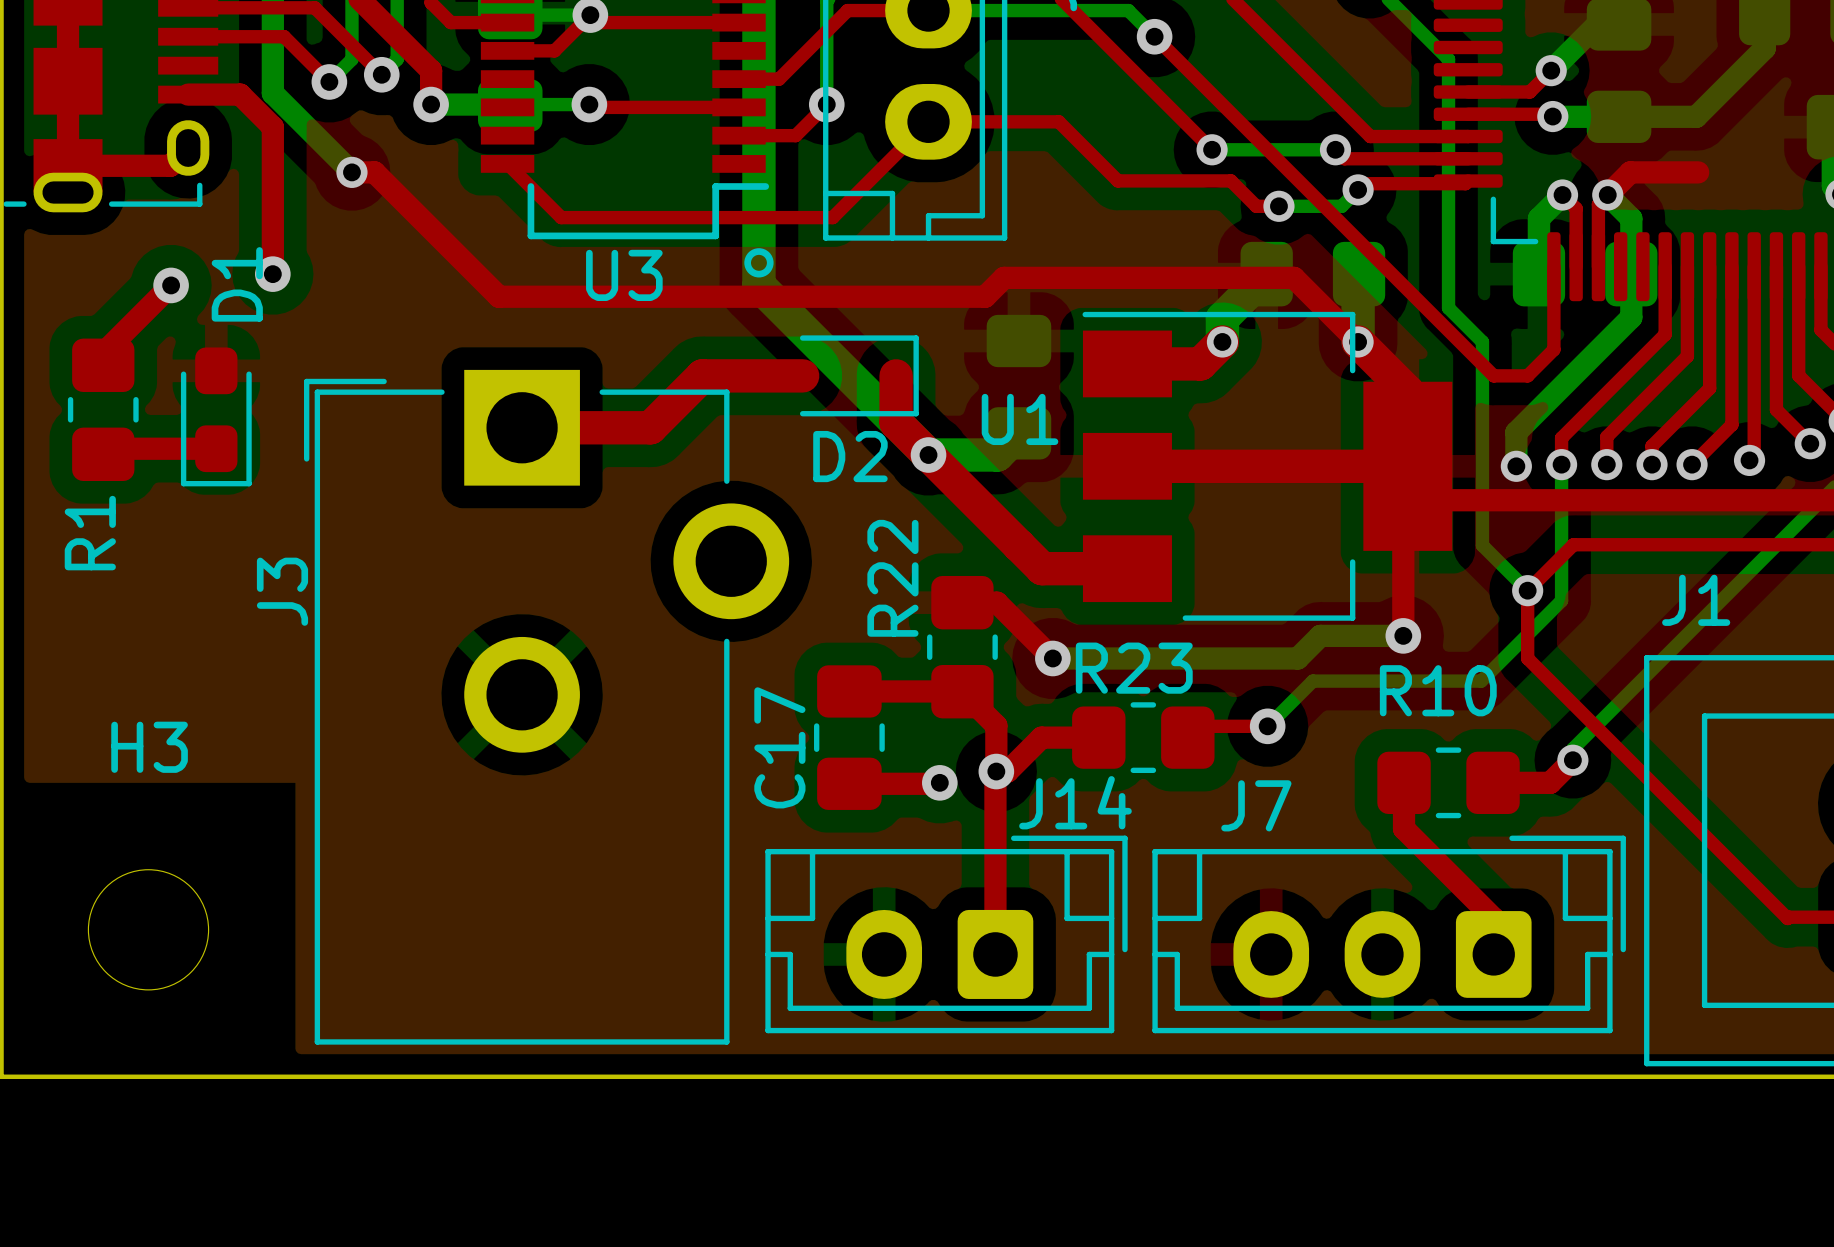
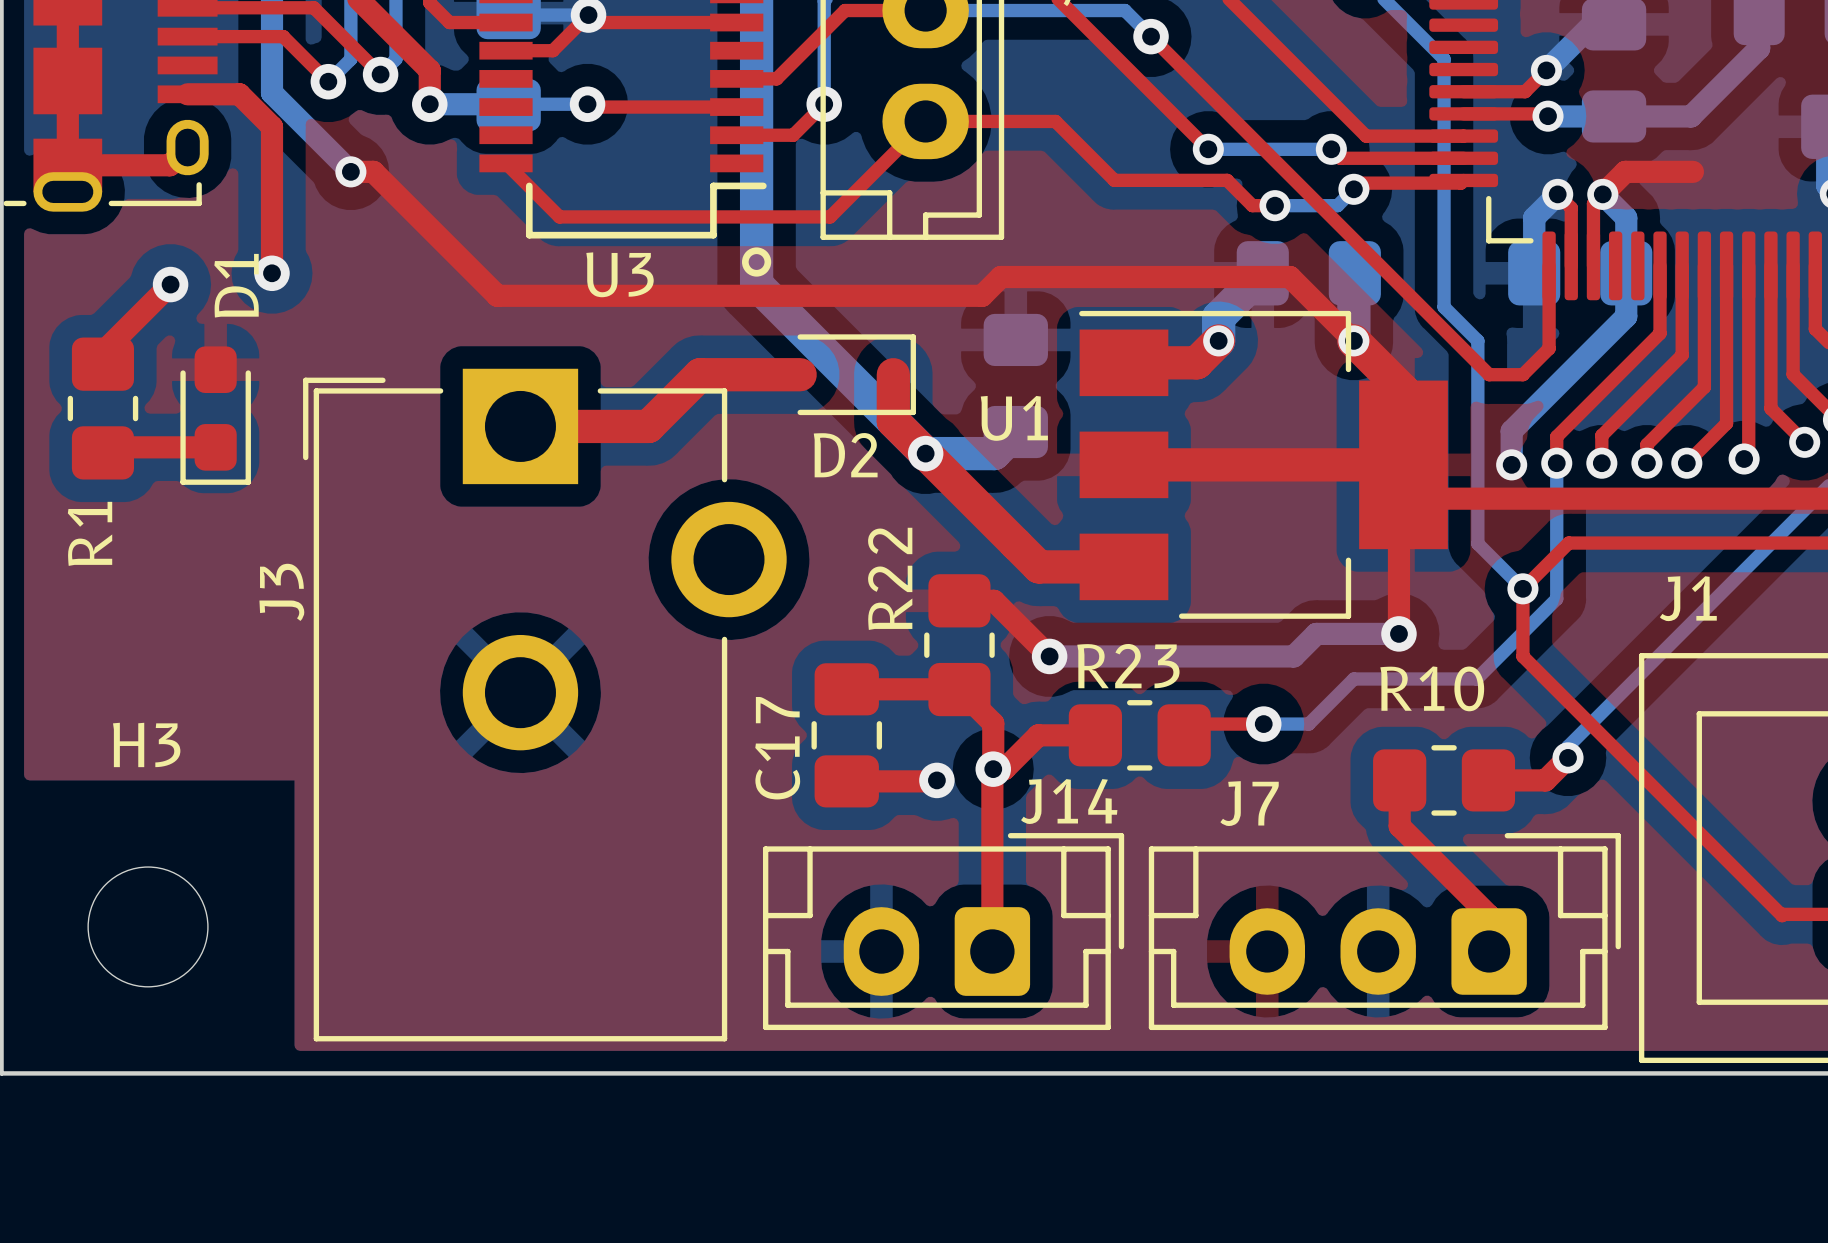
bottom track: (1358, 681) (1312, 681) (1267, 726) -> (1353, 678) (1308, 724) (1263, 724)

